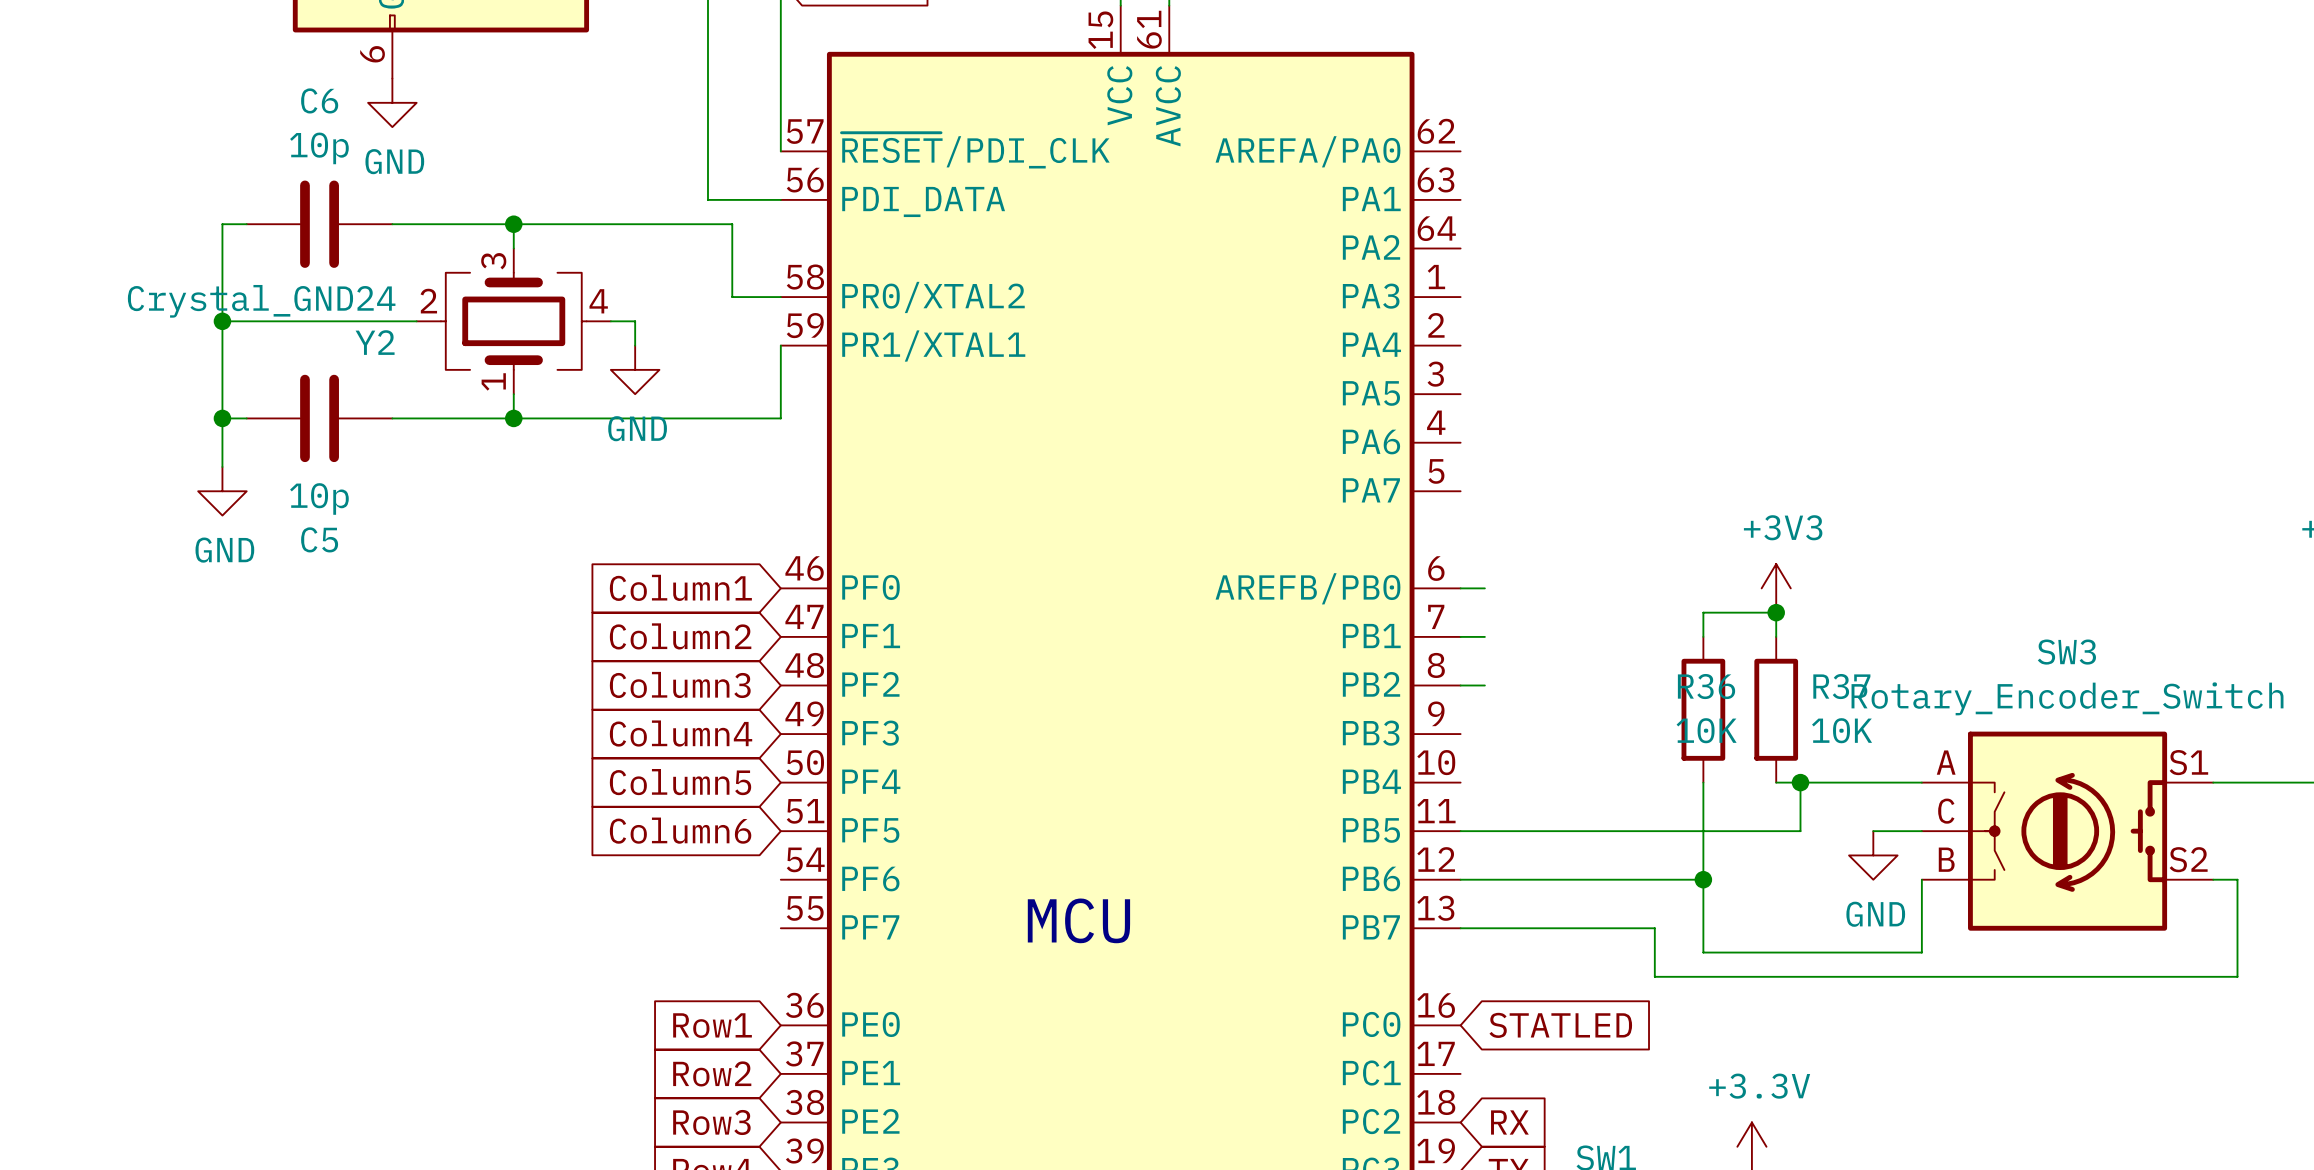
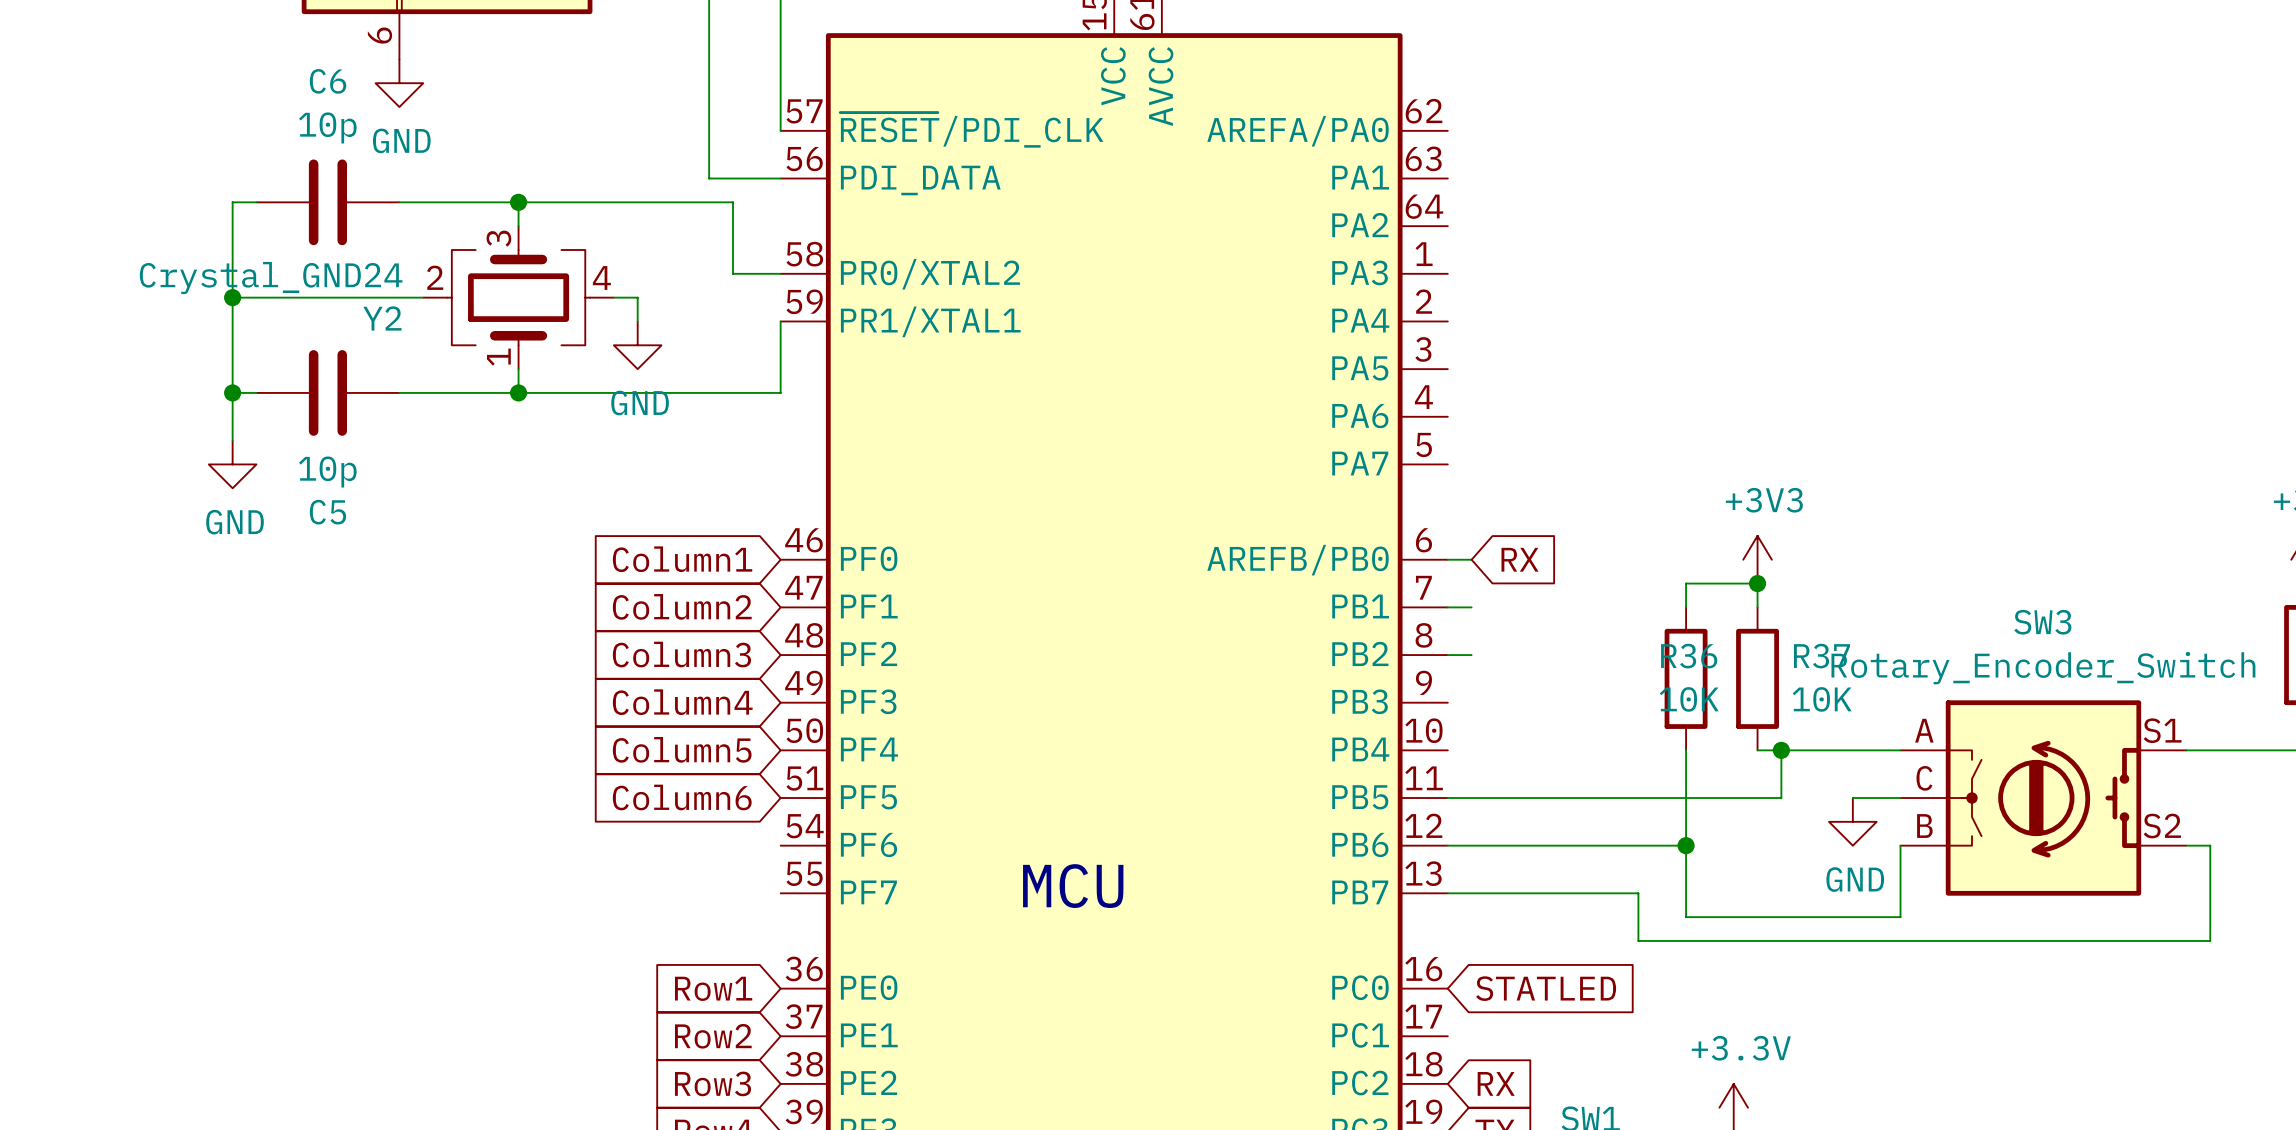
global label: none -> RX (1520, 559)

